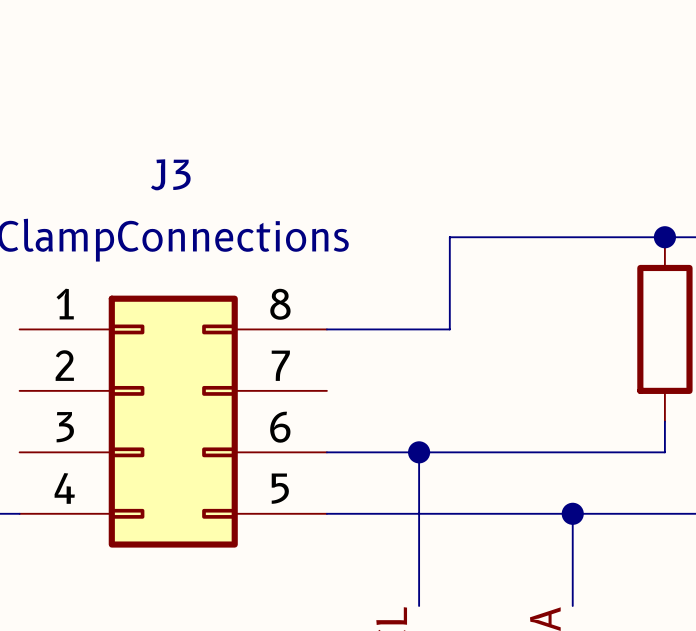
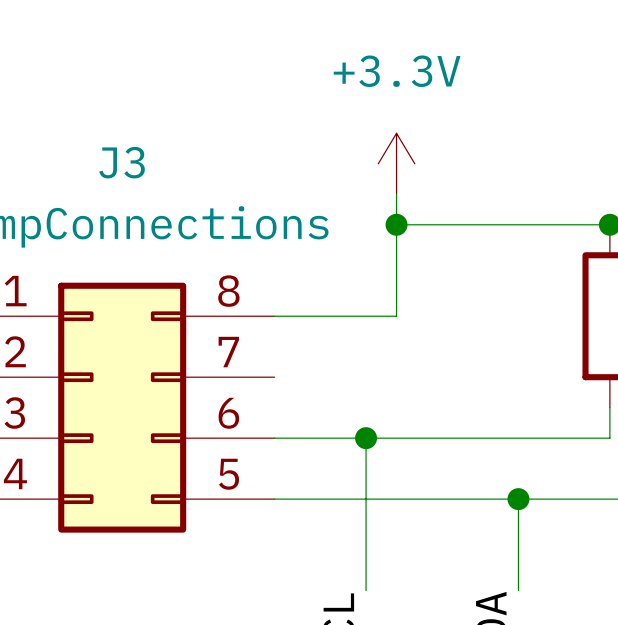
power symbol: none -> +3.3V (396, 163)
wire: none -> (396, 194) (396, 224)
junction: none -> (396, 224)

